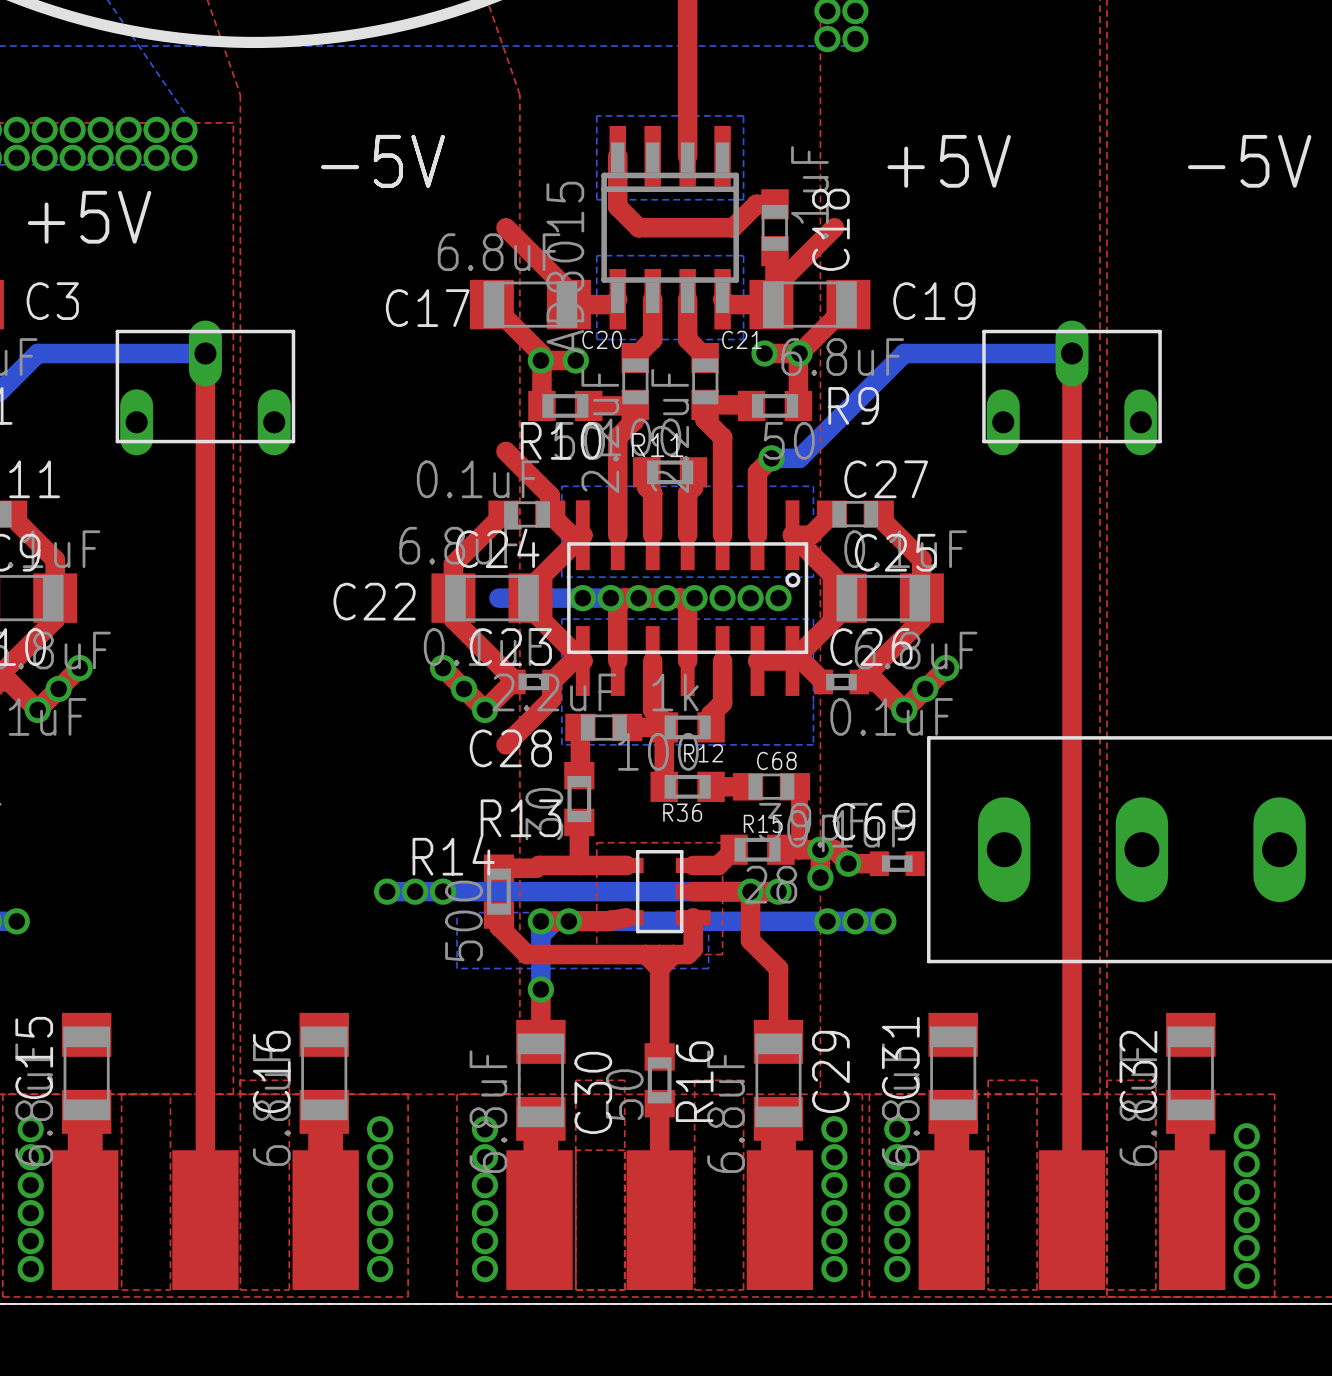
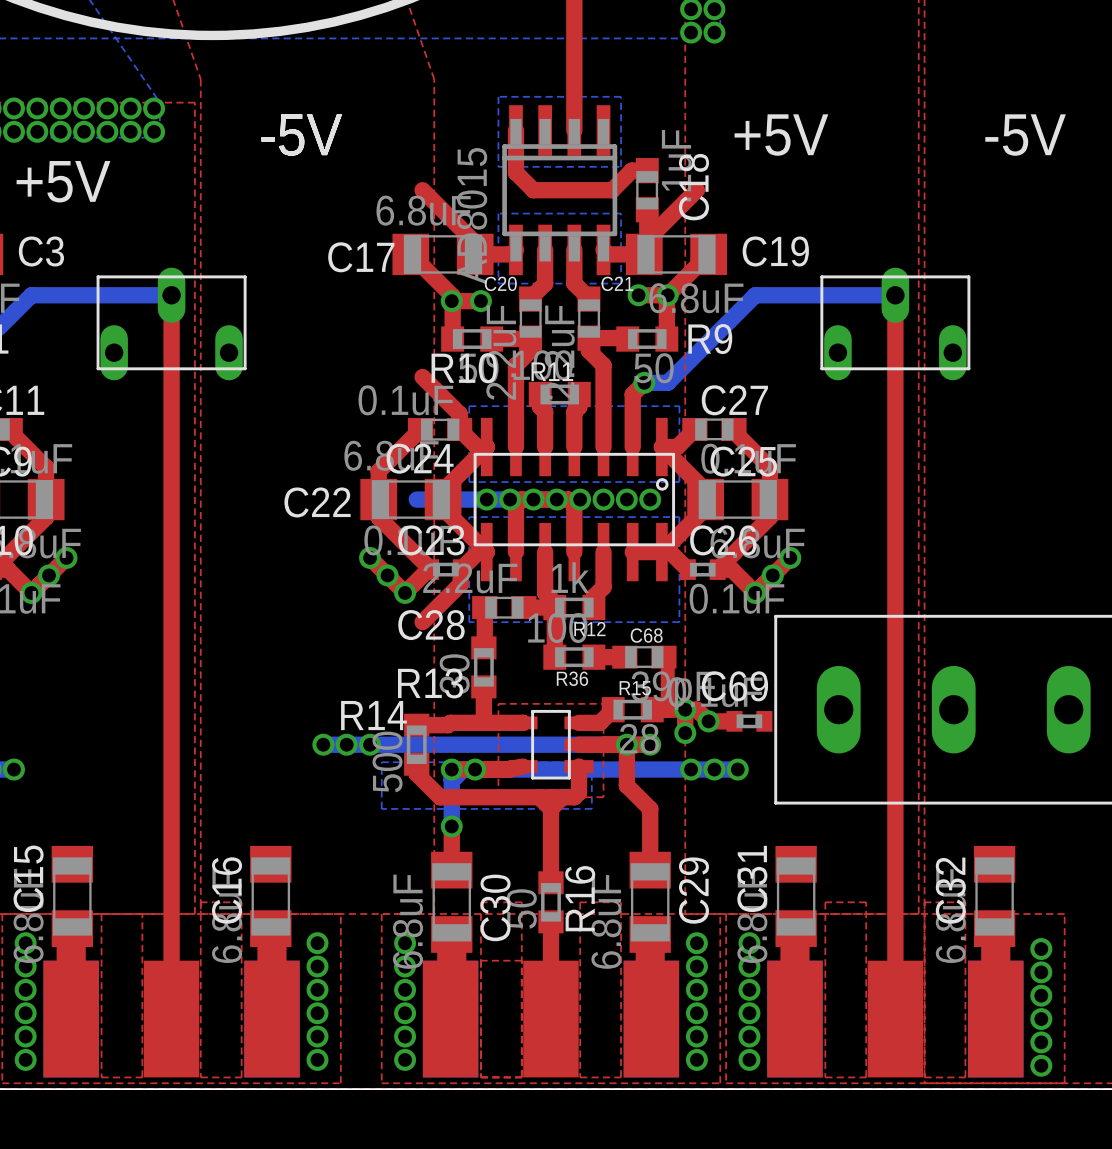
part footprint: [52, 1150, 359, 1291] -> [43, 960, 300, 1078]
part footprint: [506, 1150, 814, 1291] -> [422, 960, 680, 1078]
part footprint: [918, 1150, 1226, 1291] -> [767, 960, 1024, 1078]

